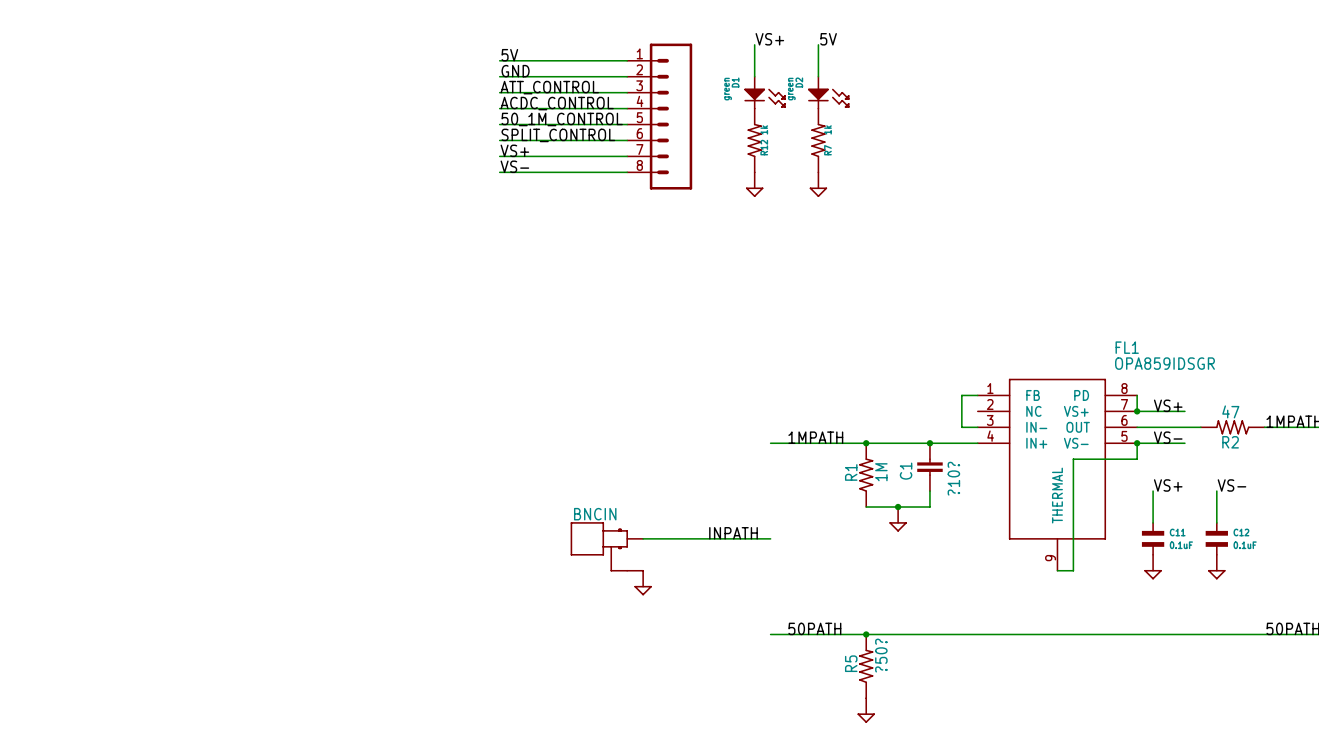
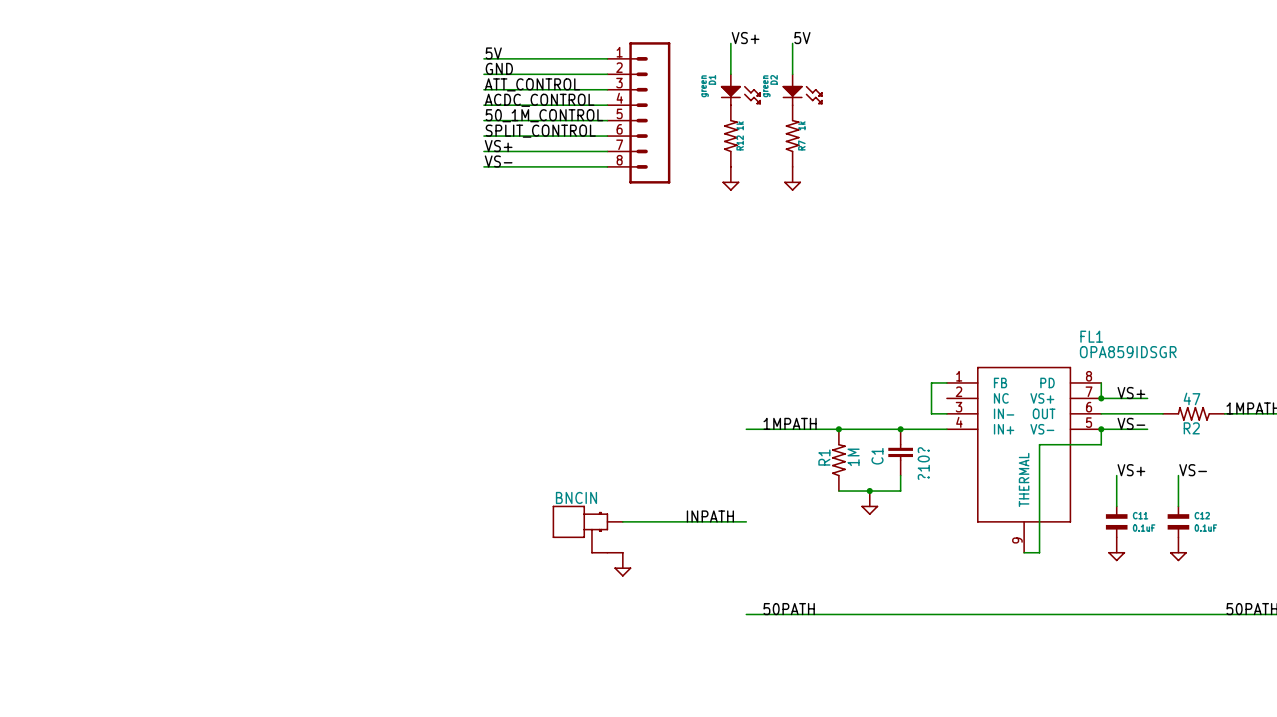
junction: (866, 634) -> none
R5: ?50? (866, 666) -> none
power symbol: (866, 710) -> none

